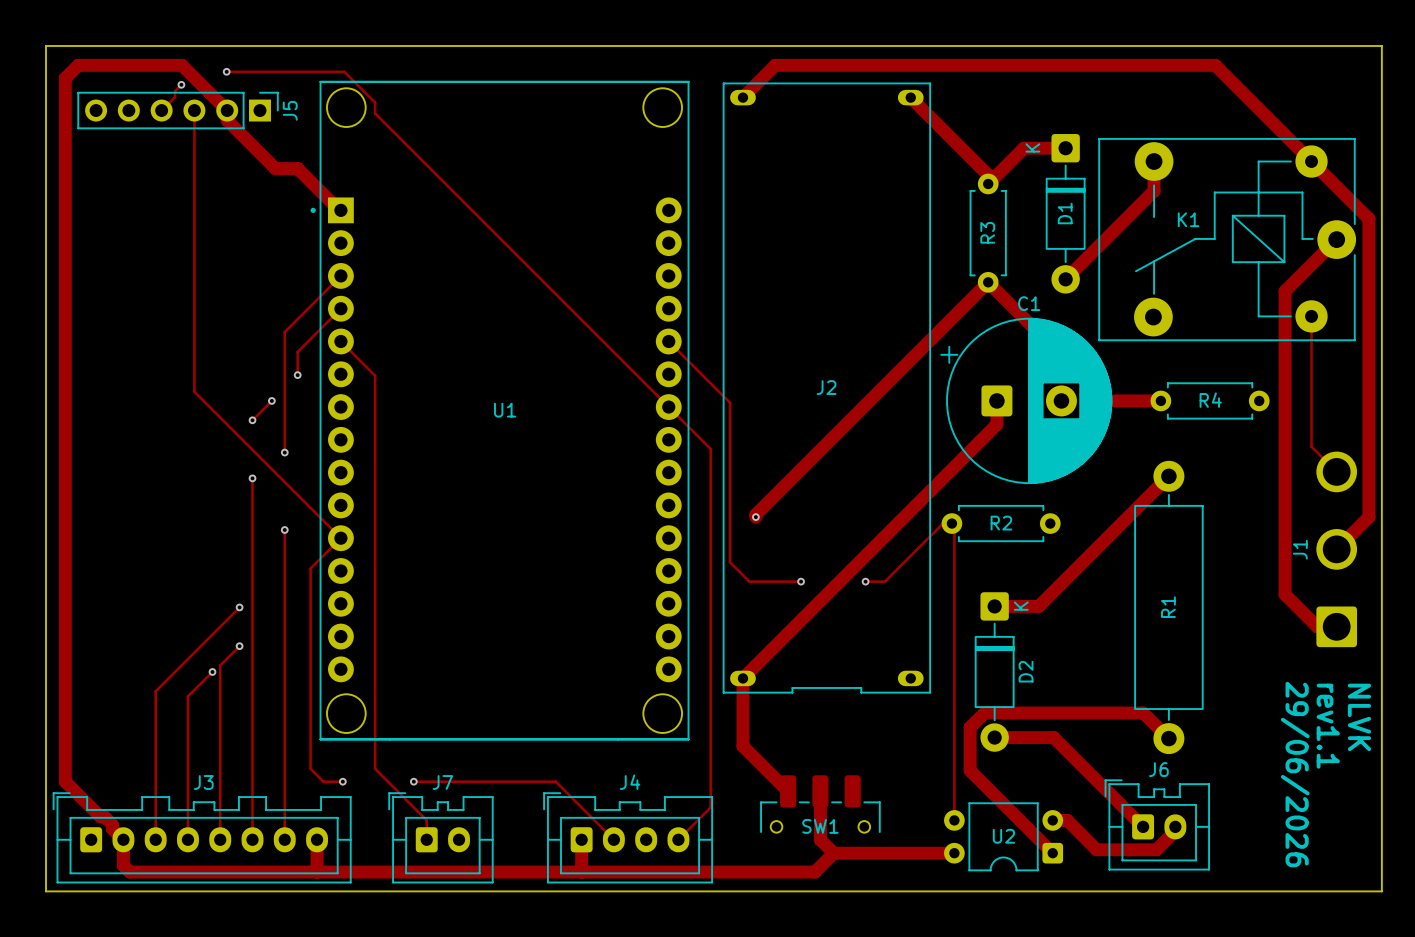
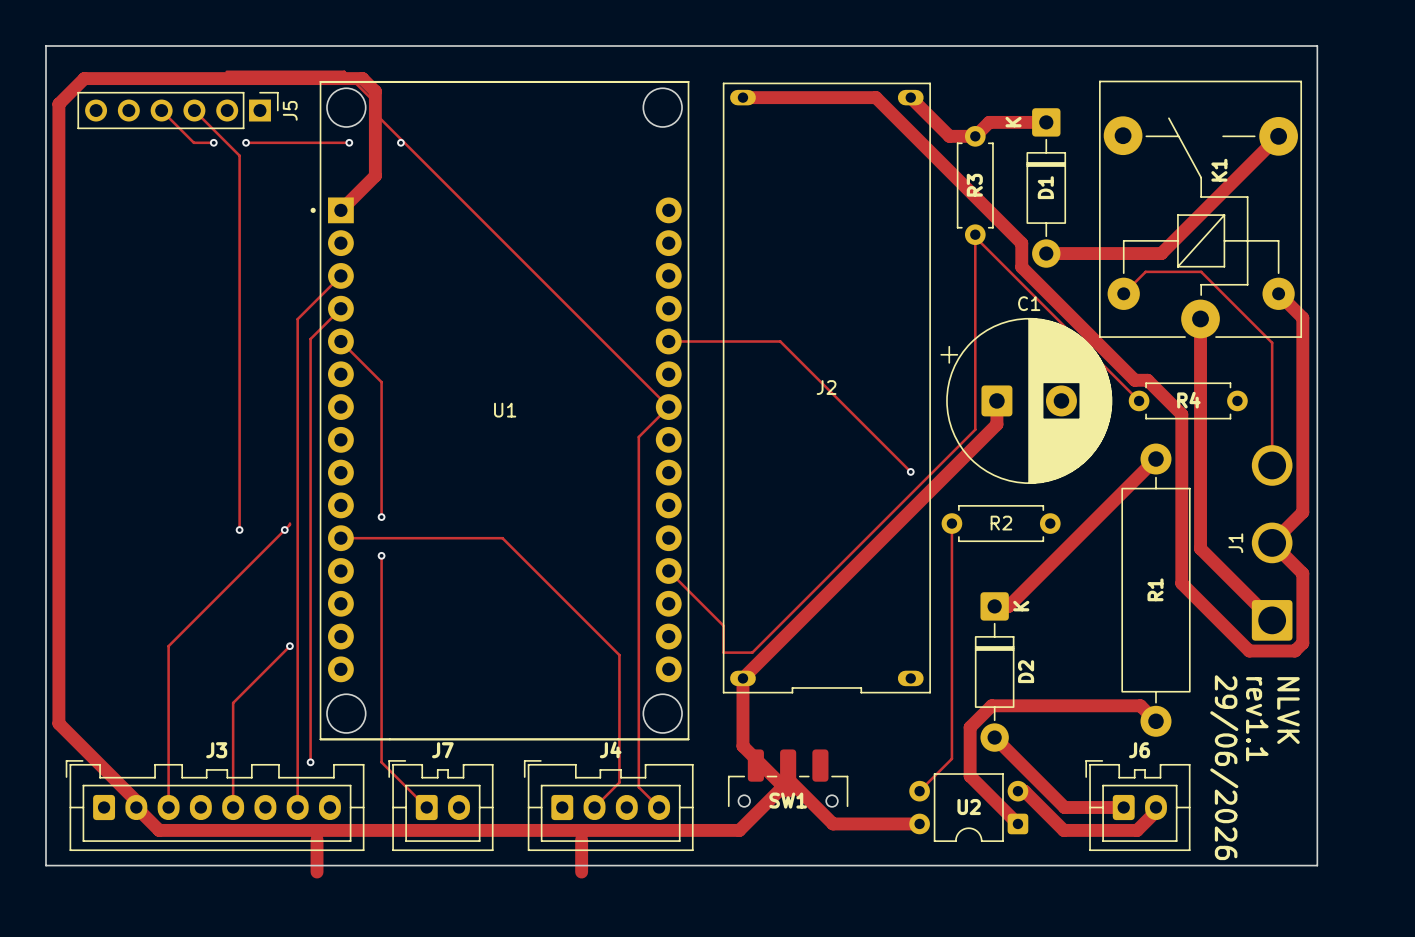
board edge: (1317, 45) (1381, 45) (1381, 891) (45, 891) (45, 865) -> (1317, 45) (1317, 865) (45, 865)
via: (226, 71) -> none
track: (181, 84) (175, 91) (175, 97) (161, 110) -> (213, 142) (193, 142) (161, 110)
via: (181, 84) -> none
track: (742, 97) (775, 65) (1215, 65) (1368, 218) (1368, 517) (1336, 549) -> (742, 97) (876, 97) (1021, 243) (1021, 267) (1134, 380) (1147, 380) (1181, 414) (1181, 583) (1249, 651) (1294, 651) (1302, 643) (1302, 573) (1272, 542) (1302, 512) (1302, 318) (1278, 293)
track: (194, 110) (194, 391) (340, 538) (310, 568) -> (194, 110) (239, 155) (239, 530)
D1 footprint: [1045, 134, 1086, 294] -> [1026, 108, 1066, 268]
track: (949, 136) (988, 175) (988, 183) (1023, 148) (1065, 148) -> (949, 136) (975, 136) (989, 122) (1046, 122)
track: none -> (1278, 136) (1161, 253) (1046, 253)
K1 footprint: [1098, 138, 1357, 342] -> [1099, 80, 1302, 339]
via: none -> (213, 142)
track: none -> (246, 142) (349, 142)
via: none -> (246, 142)
via: none -> (349, 142)
via: none -> (400, 142)
track: (1154, 161) (1154, 190) (1065, 279) -> none
R3 footprint: [969, 173, 1007, 293] -> [956, 126, 994, 246]
track: (340, 210) (297, 168) (275, 168) (227, 120) (227, 110) (182, 65) (78, 65) (65, 78) (65, 781) (100, 816) (104, 816) (112, 824) (112, 828) (123, 839) (123, 865) (129, 872) (814, 872) (833, 853) -> (340, 210) (375, 175) (375, 91) (362, 78) (84, 78) (58, 104) (58, 723) (136, 801) (136, 807) (159, 830) (739, 830) (788, 781) (788, 765)
K1 name position: K1 (1188, 219) -> K1 (1219, 170)
track: none -> (975, 234) (975, 429) (752, 652) (723, 652) (723, 625) (668, 570)
track: none -> (975, 237) (1139, 400)
track: (1336, 239) (1285, 291) (1285, 594) (1317, 626) (1336, 626) -> none
track: none -> (1123, 293) (1145, 271) (1201, 271) (1272, 342) (1272, 465)
track: (1311, 316) (1311, 446) (1336, 471) -> none
track: none -> (1200, 318) (1200, 548) (1272, 620)
track: (297, 319) (284, 332) (284, 452) -> none
track: (310, 339) (297, 351) -> (297, 319) (297, 351)
track: none -> (310, 339) (310, 568)
track: (668, 341) (730, 402) (730, 562) (749, 581) (801, 581) -> (668, 341) (780, 341) (910, 471)
track: none -> (297, 375) (297, 807)
via: (297, 375) -> none
track: (375, 375) (375, 768) (426, 820) (426, 839) -> (375, 375) (381, 382) (381, 517)
R4 footprint: [1150, 382, 1270, 420] -> [1128, 382, 1248, 420]
track: (271, 400) (252, 420) -> none
via: (271, 400) -> none
track: (1160, 400) (1106, 400) (988, 282) (755, 514) (755, 517) -> none
track: (668, 407) (710, 449) (710, 807) (678, 839) -> (668, 407) (638, 437) (638, 787) (659, 807)
via: (252, 420) -> none
via: (284, 452) -> none
R1 footprint: [1134, 460, 1204, 755] -> [1121, 443, 1191, 737]
via: none -> (910, 471)
track: (1168, 476) (1038, 606) (1008, 606) -> (1155, 459) (1008, 606)
track: (252, 478) (252, 839) -> none
via: (252, 478) -> none
via: none -> (381, 517)
via: (755, 517) -> none
track: none -> (289, 523) (168, 646) (168, 807)
track: none -> (951, 523) (951, 758) (919, 791)
via: none -> (239, 530)
track: (284, 530) (284, 839) -> none
track: none -> (340, 538) (502, 538) (619, 655) (619, 782) (594, 807)
J1 position: (1336, 549) -> (1272, 542)
track: none -> (381, 555) (381, 762) (426, 807)
via: none -> (381, 555)
via: (801, 581) -> none
track: (865, 581) (884, 581) (943, 523) (951, 523) (954, 526) (954, 820) -> none
via: (865, 581) -> none
D2 footprint: [974, 592, 1015, 752] -> [975, 592, 1015, 752]
track: (239, 607) (155, 691) (155, 839) -> none
via: (239, 607) -> none
track: (239, 646) (220, 665) (220, 839) -> none
via: (239, 646) -> none
track: none -> (289, 646) (233, 702) (233, 807)
via: none -> (289, 646)
track: (212, 671) (187, 696) (187, 839) -> none
via: (212, 671) -> none
track: (984, 713) (1143, 713) (1168, 738) -> (984, 713) (991, 705) (1140, 705) (1155, 721)
text position: NLVK (1359, 717) -> NLVK (1288, 710)
text position: rev1.1 (1328, 726) -> rev1.1 (1257, 719)
track: (994, 737) (1053, 737) (1143, 826) -> (994, 737) (1064, 807) (1123, 807)
track: (310, 762) (310, 768) (323, 781) (342, 781) -> none
track: (970, 770) (1052, 853) -> (970, 770) (970, 776) (1017, 823)
text position: 29/06/2026 (1295, 774) -> 29/06/2026 (1224, 767)
SW1 footprint: [760, 775, 881, 833] -> [728, 749, 849, 807]
track: none -> (788, 779) (833, 823) (919, 823)
J6 footprint: [1104, 779, 1210, 871] -> [1085, 760, 1191, 851]
via position: (342, 781) -> (310, 762)
track: (413, 781) (555, 781) (613, 839) -> none
via: (413, 781) -> none
track: (820, 791) (820, 839) (833, 853) -> none
track: none -> (1017, 791) (1024, 791) (1063, 830) (1137, 830) (1155, 811) (1155, 807)
J3 footprint: [52, 792, 352, 884] -> [65, 760, 365, 851]
J7 footprint: [388, 792, 494, 884] -> [388, 760, 494, 851]
J4 footprint: [543, 792, 713, 884] -> [524, 760, 694, 851]
U2 footprint: [944, 802, 1064, 872] -> [909, 773, 1029, 842]
track: (1052, 820) (1067, 820) (1096, 849) (1156, 849) (1175, 830) (1175, 826) -> none
track: (833, 853) (954, 853) -> none

